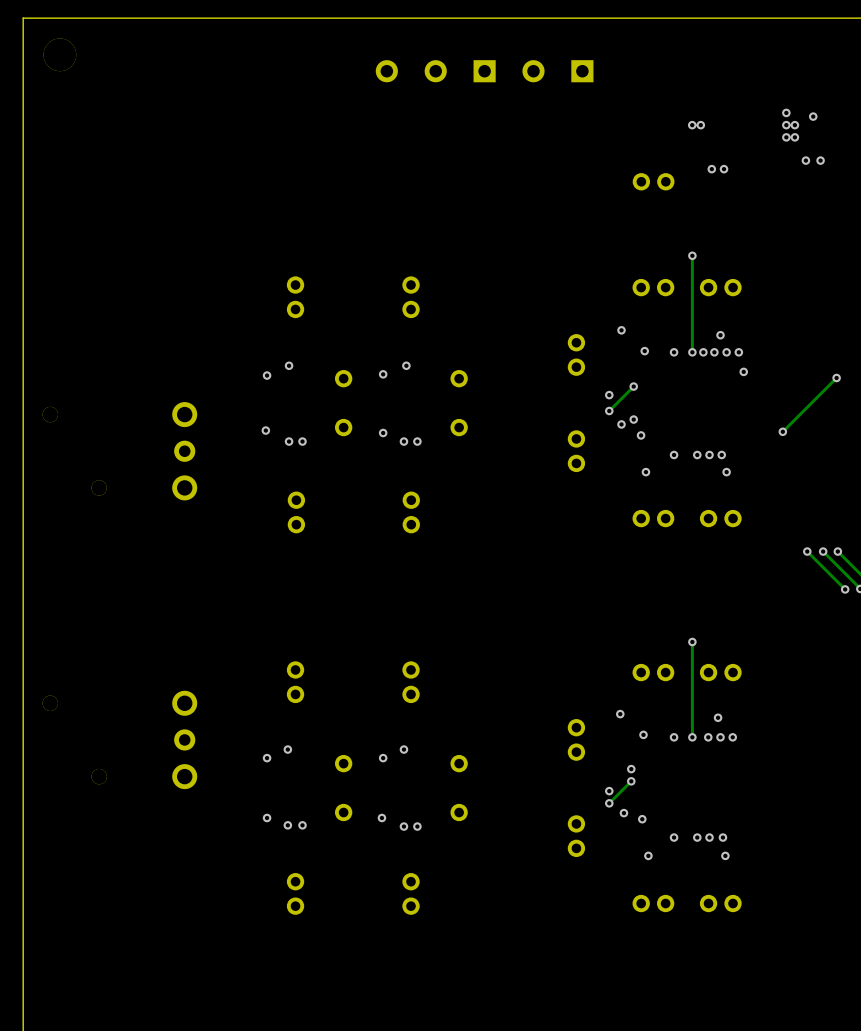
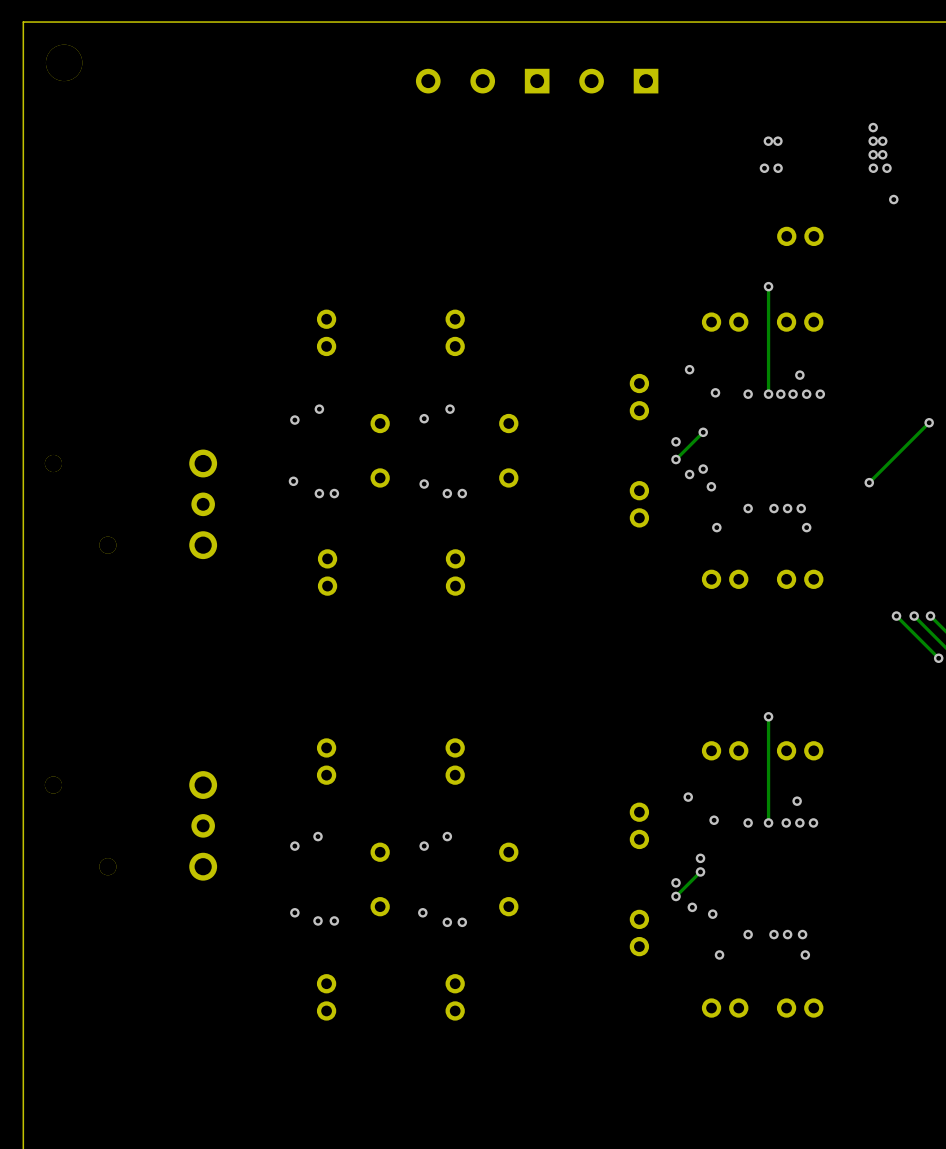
via: (813, 116) -> none
via: none -> (764, 168)
via: none -> (778, 168)
via: none -> (873, 168)
via: none -> (886, 168)
via: (805, 160) -> none
via: (820, 160) -> none
via: (711, 169) -> none
via: (724, 169) -> none
via: none -> (893, 199)
part position: (653, 181) -> (800, 236)
via: (743, 371) -> none

